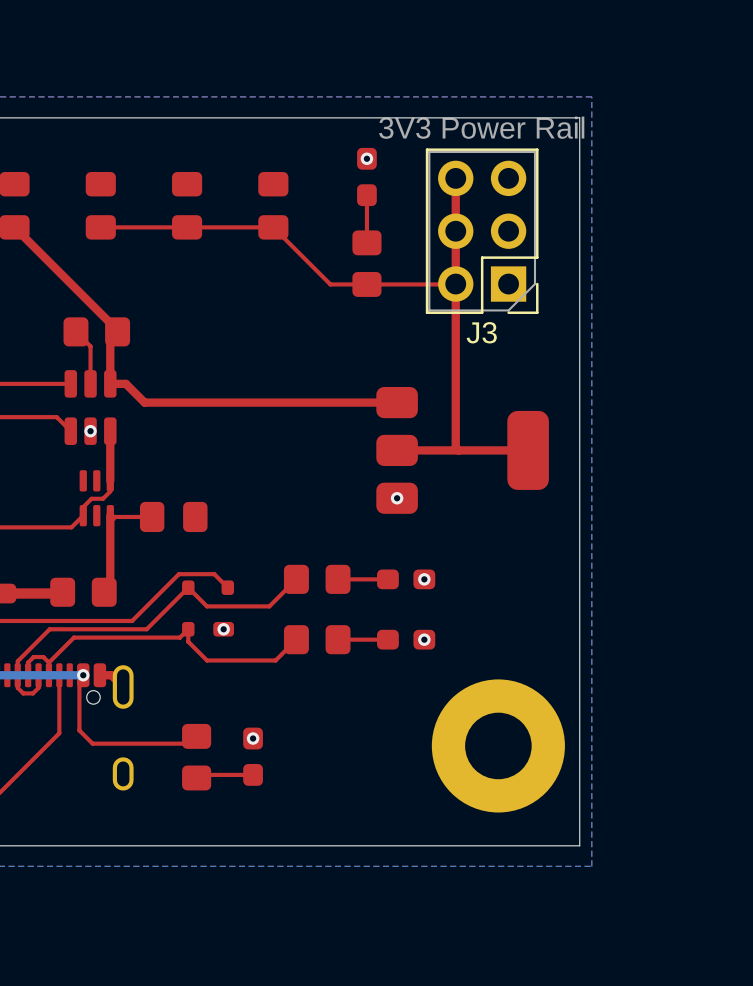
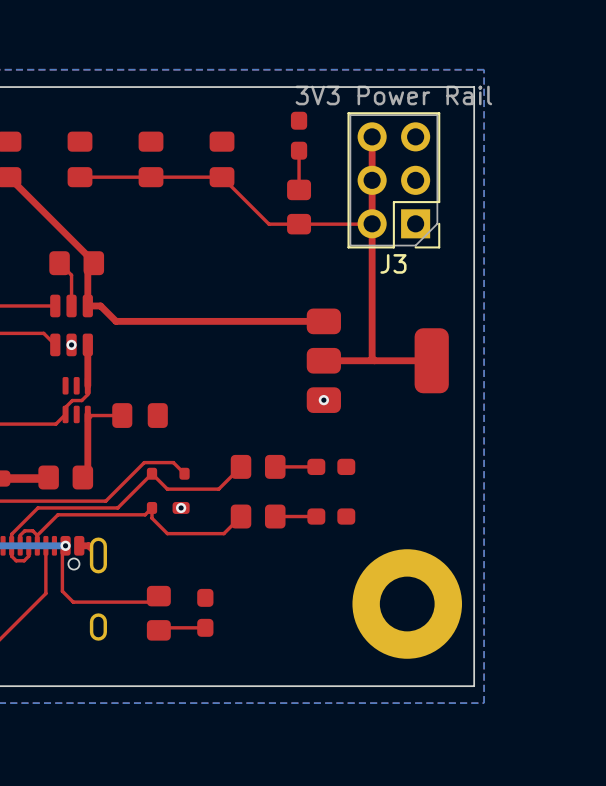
via: (366, 158) -> none
via: (424, 579) -> none
via: (424, 639) -> none
via: (253, 738) -> none

